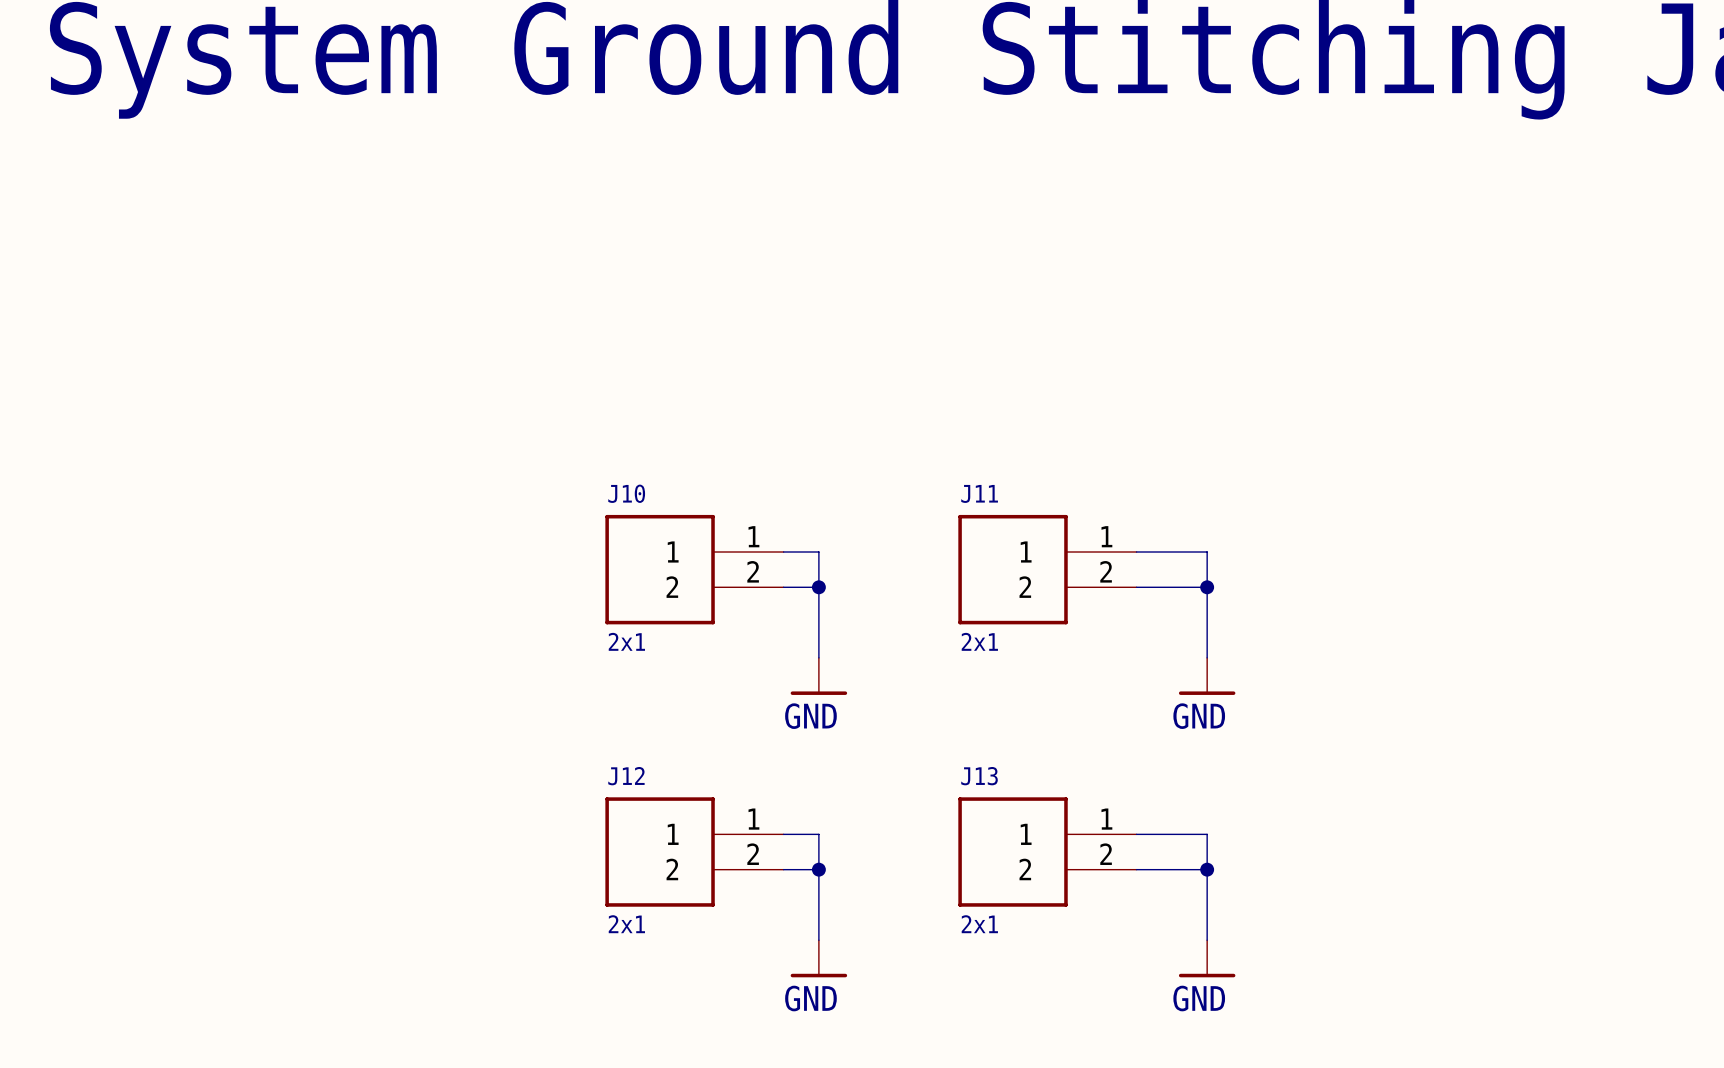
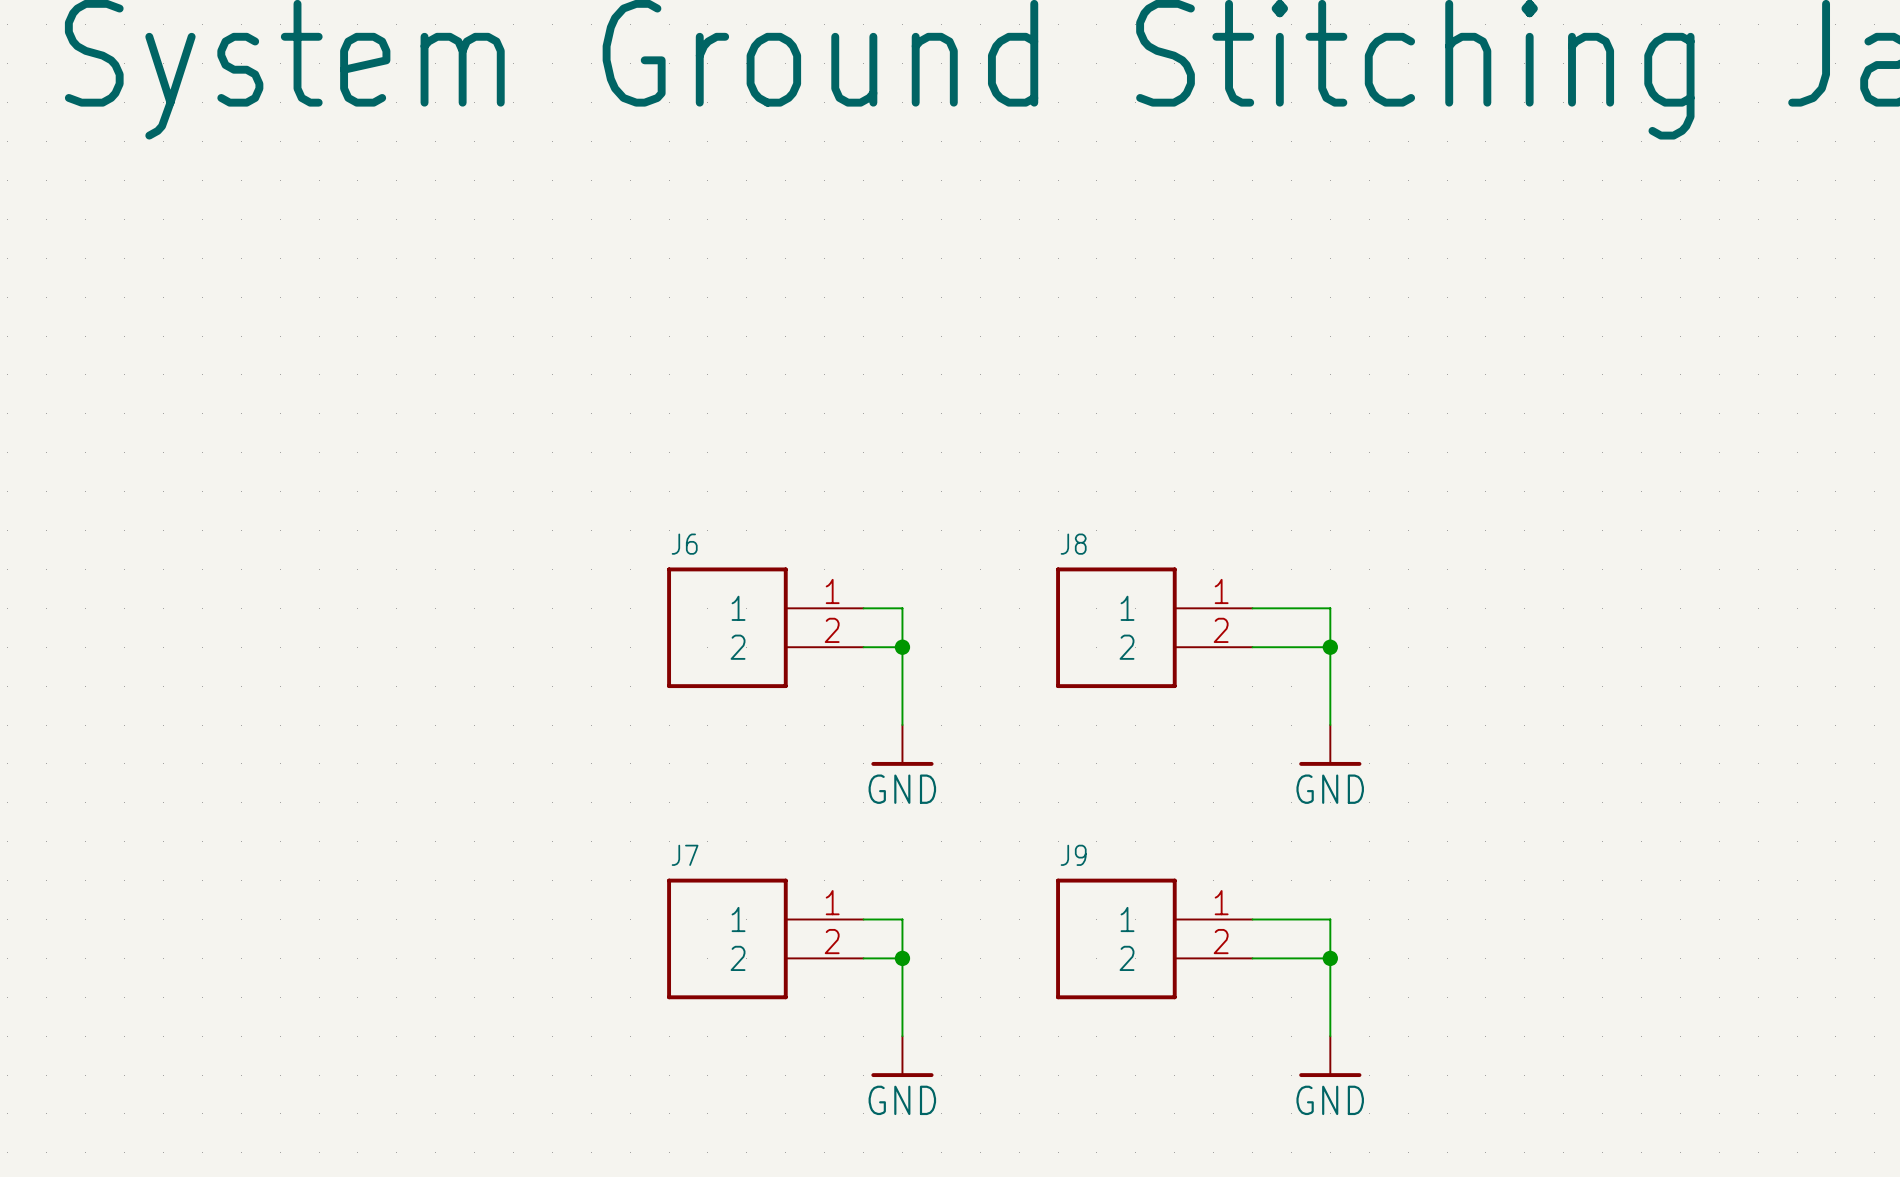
J10 name: J10 (626, 493) -> J6 (684, 544)
J11 name: J11 (979, 493) -> J8 (1073, 544)
J10 value: 2x1 (626, 641) -> none
J11 value: 2x1 (979, 641) -> none
J12 name: J12 (626, 776) -> J7 (685, 855)
J13 name: J13 (979, 776) -> J9 (1073, 855)
J12 value: 2x1 (626, 924) -> none
J13 value: 2x1 (979, 924) -> none

